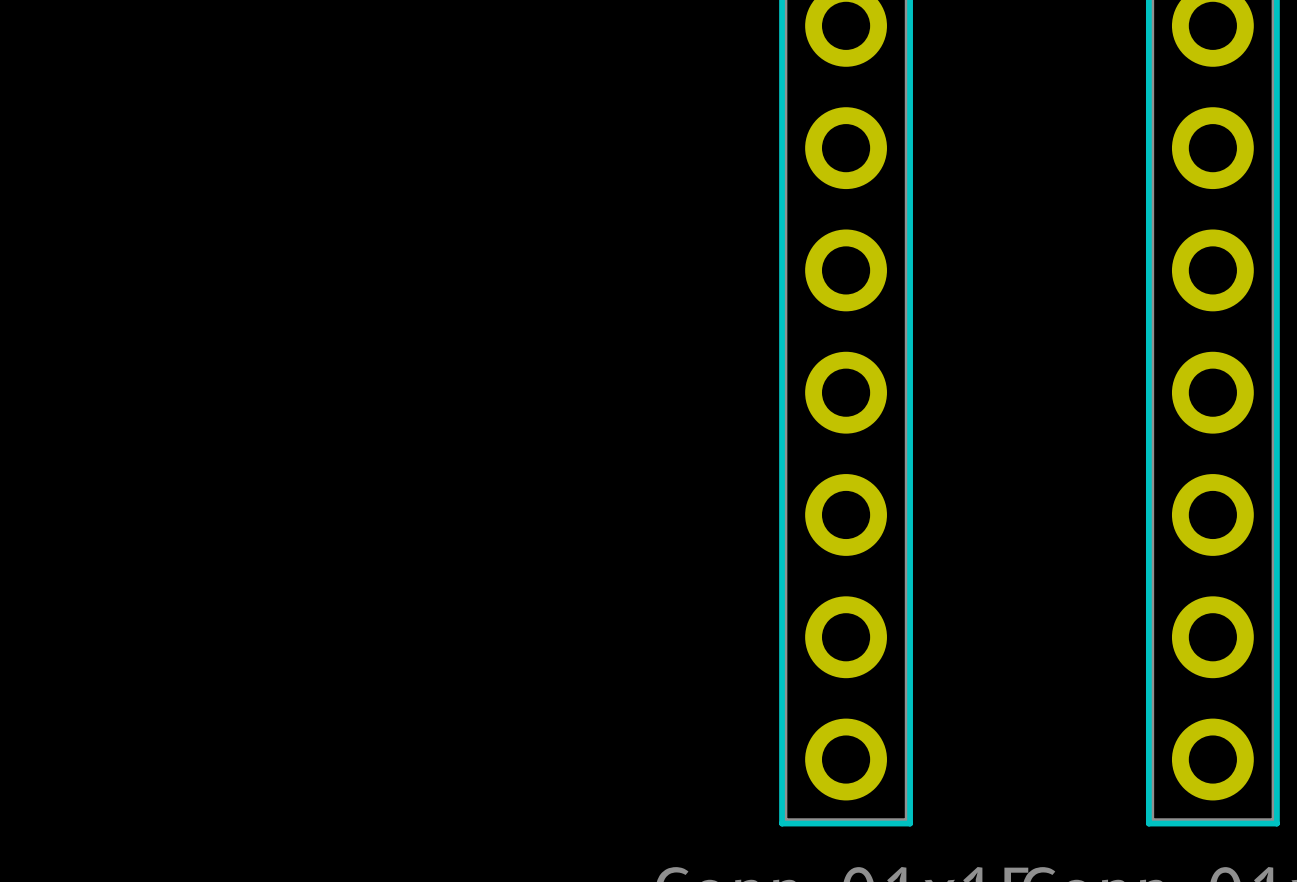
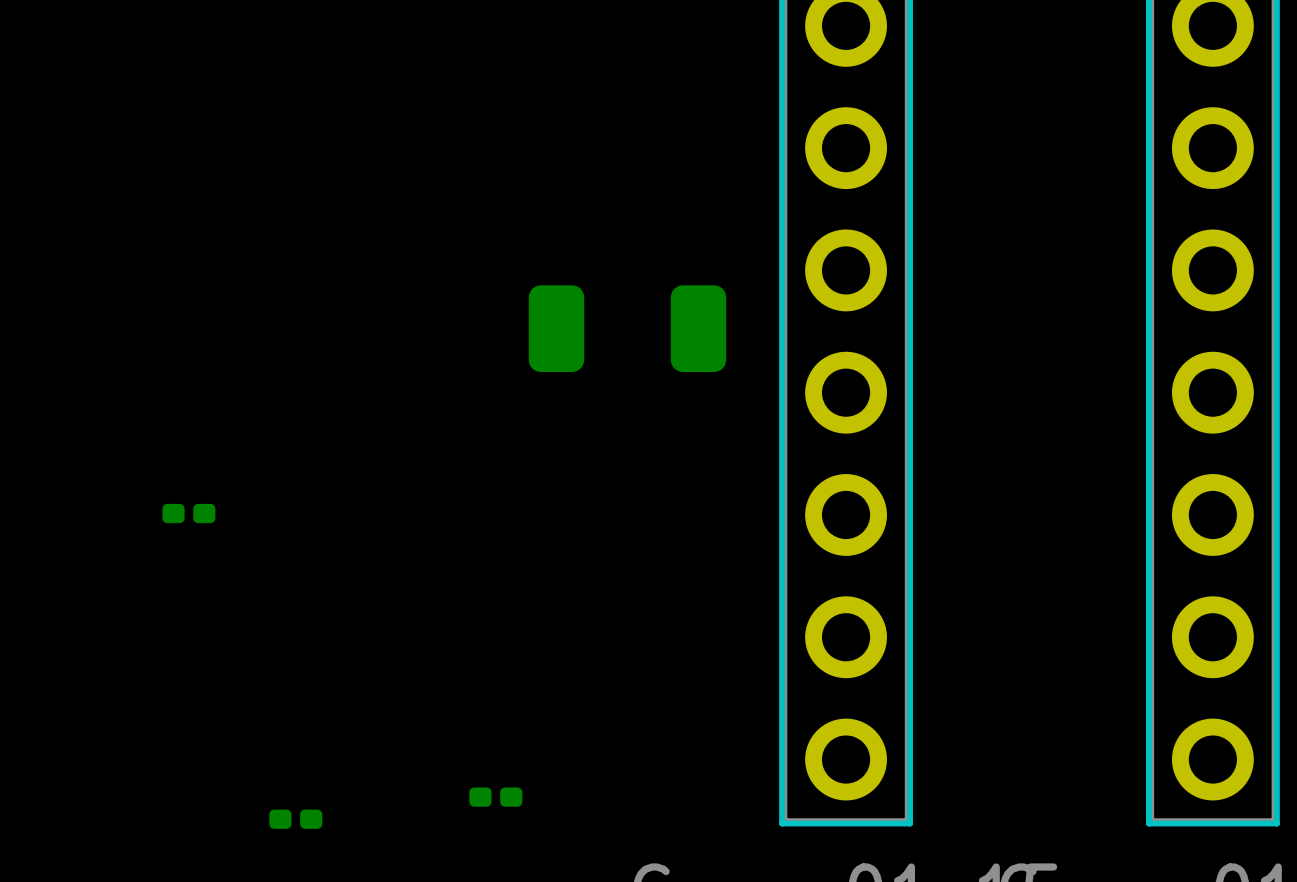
part: none -> (627, 328)
part: none -> (188, 513)
part: none -> (495, 797)
part: none -> (295, 819)

